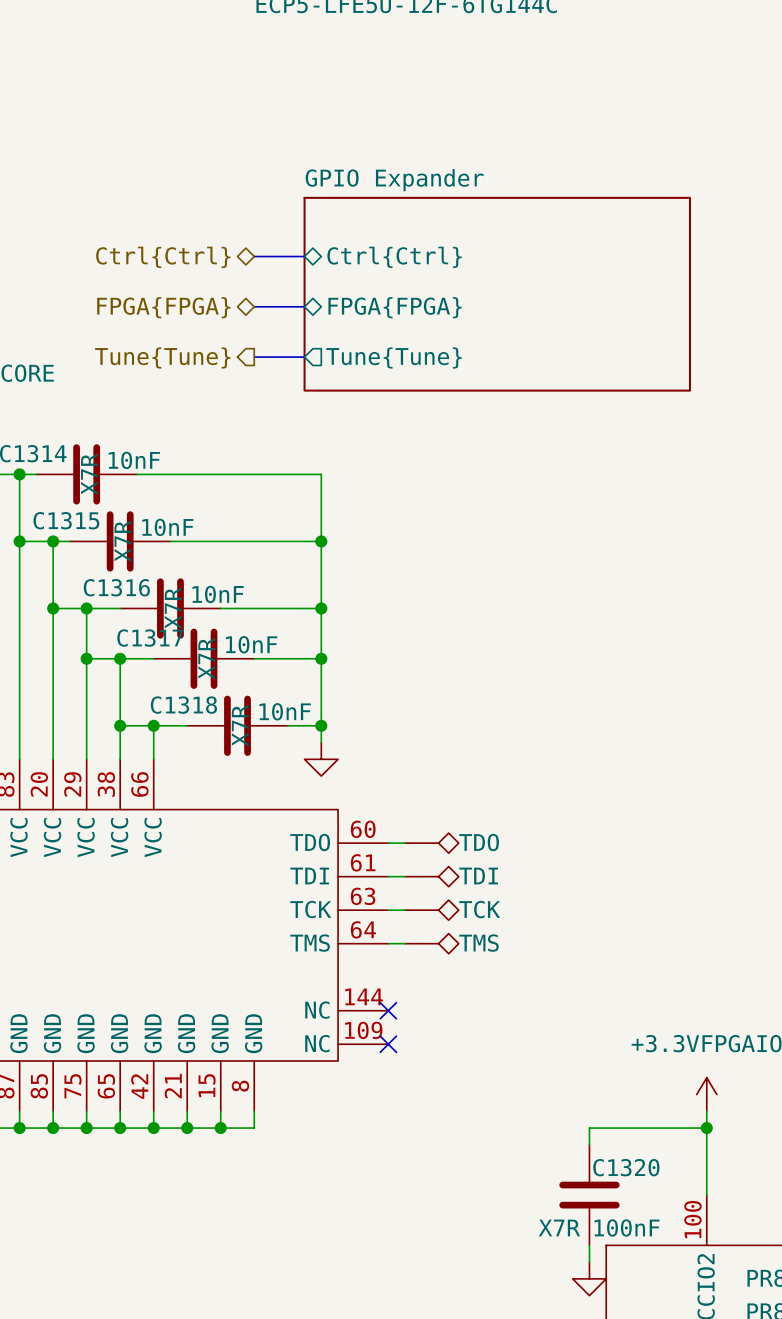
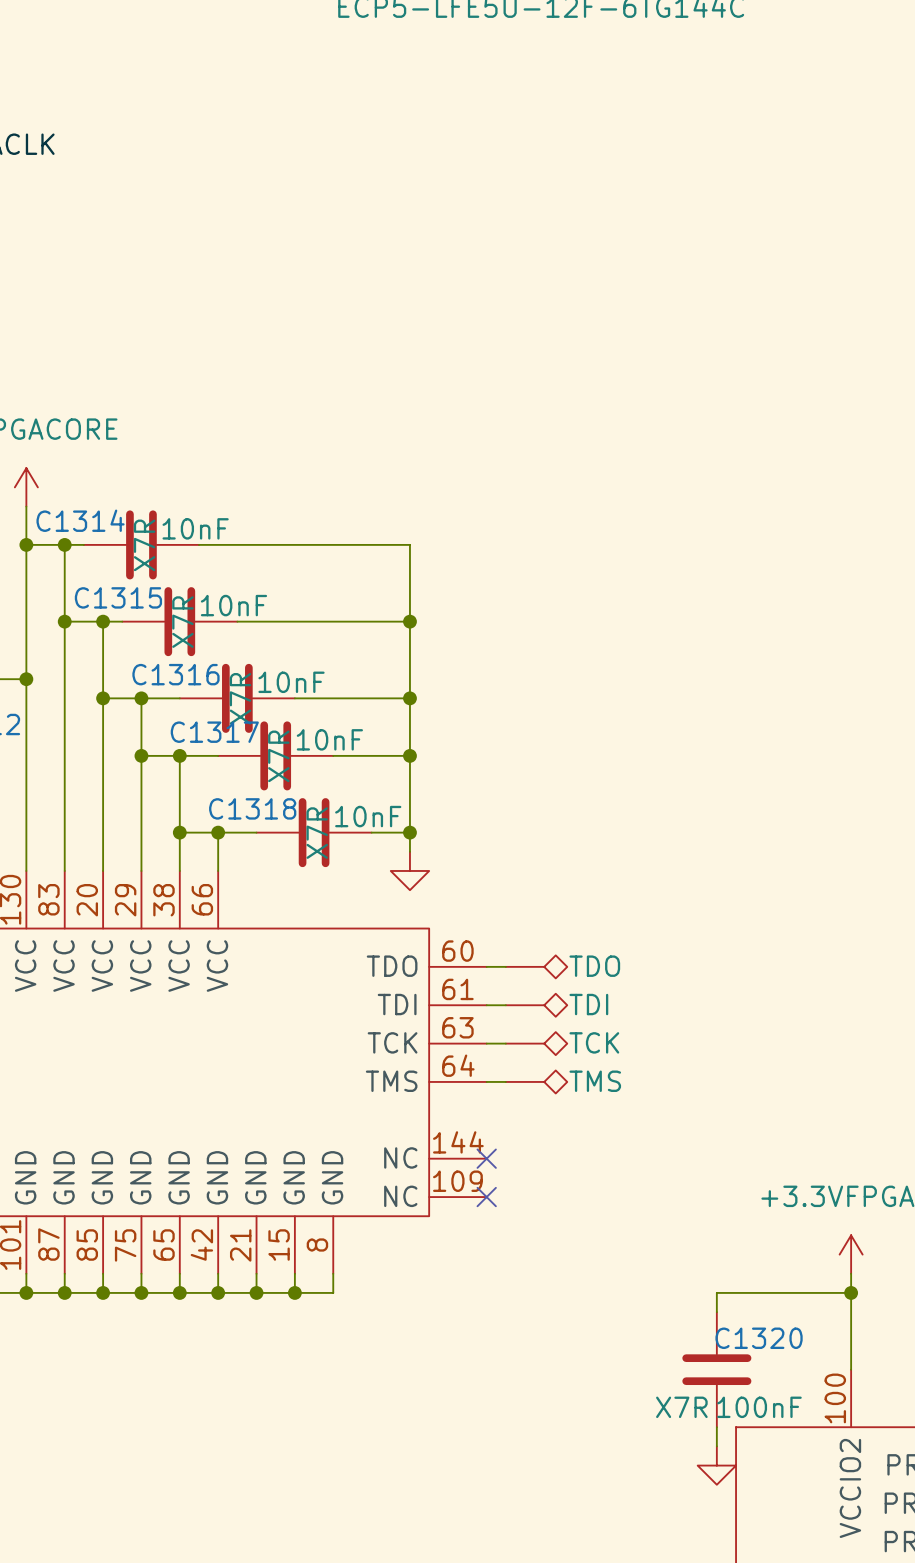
bus: (254, 256) (304, 256) -> none
hierarchical label: Ctrl{Ctrl} (163, 257) -> none
sheet pin: Ctrl{Ctrl} (394, 257) -> none
sheet GPIO Expander: (497, 294) -> none
bus: (254, 306) (304, 306) -> none
hierarchical label: FPGA{FPGA} (163, 307) -> none
sheet pin: FPGA{FPGA} (395, 307) -> none
hierarchical label: Tune{Tune} (162, 357) -> none
bus: (254, 357) (304, 357) -> none
sheet pin: Tune{Tune} (394, 357) -> none

